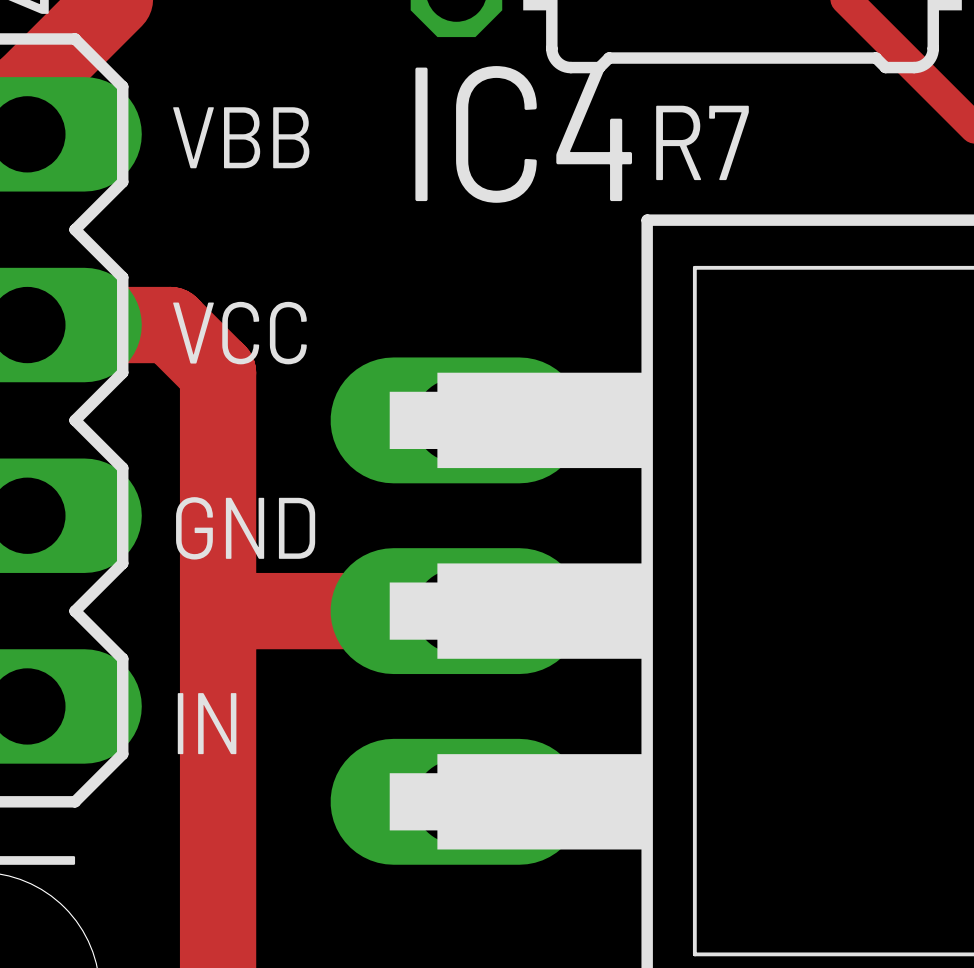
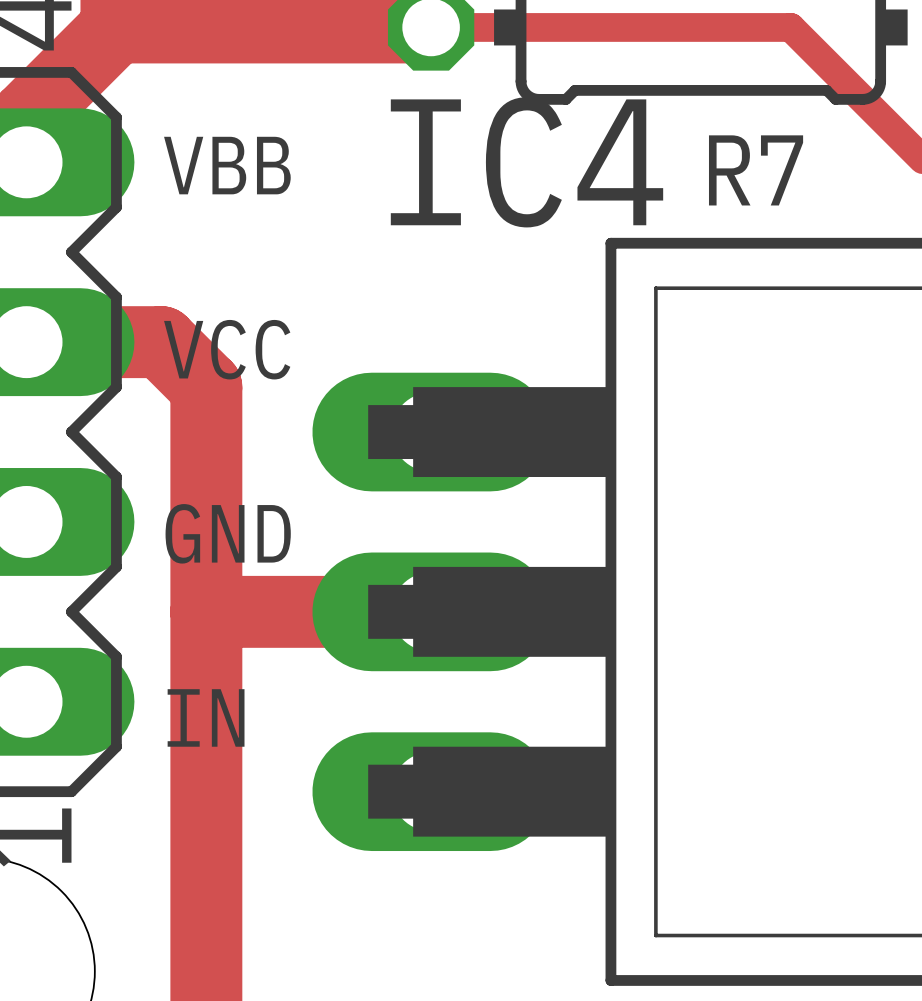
R7 name position: R7 (702, 142) -> R7 (756, 170)

